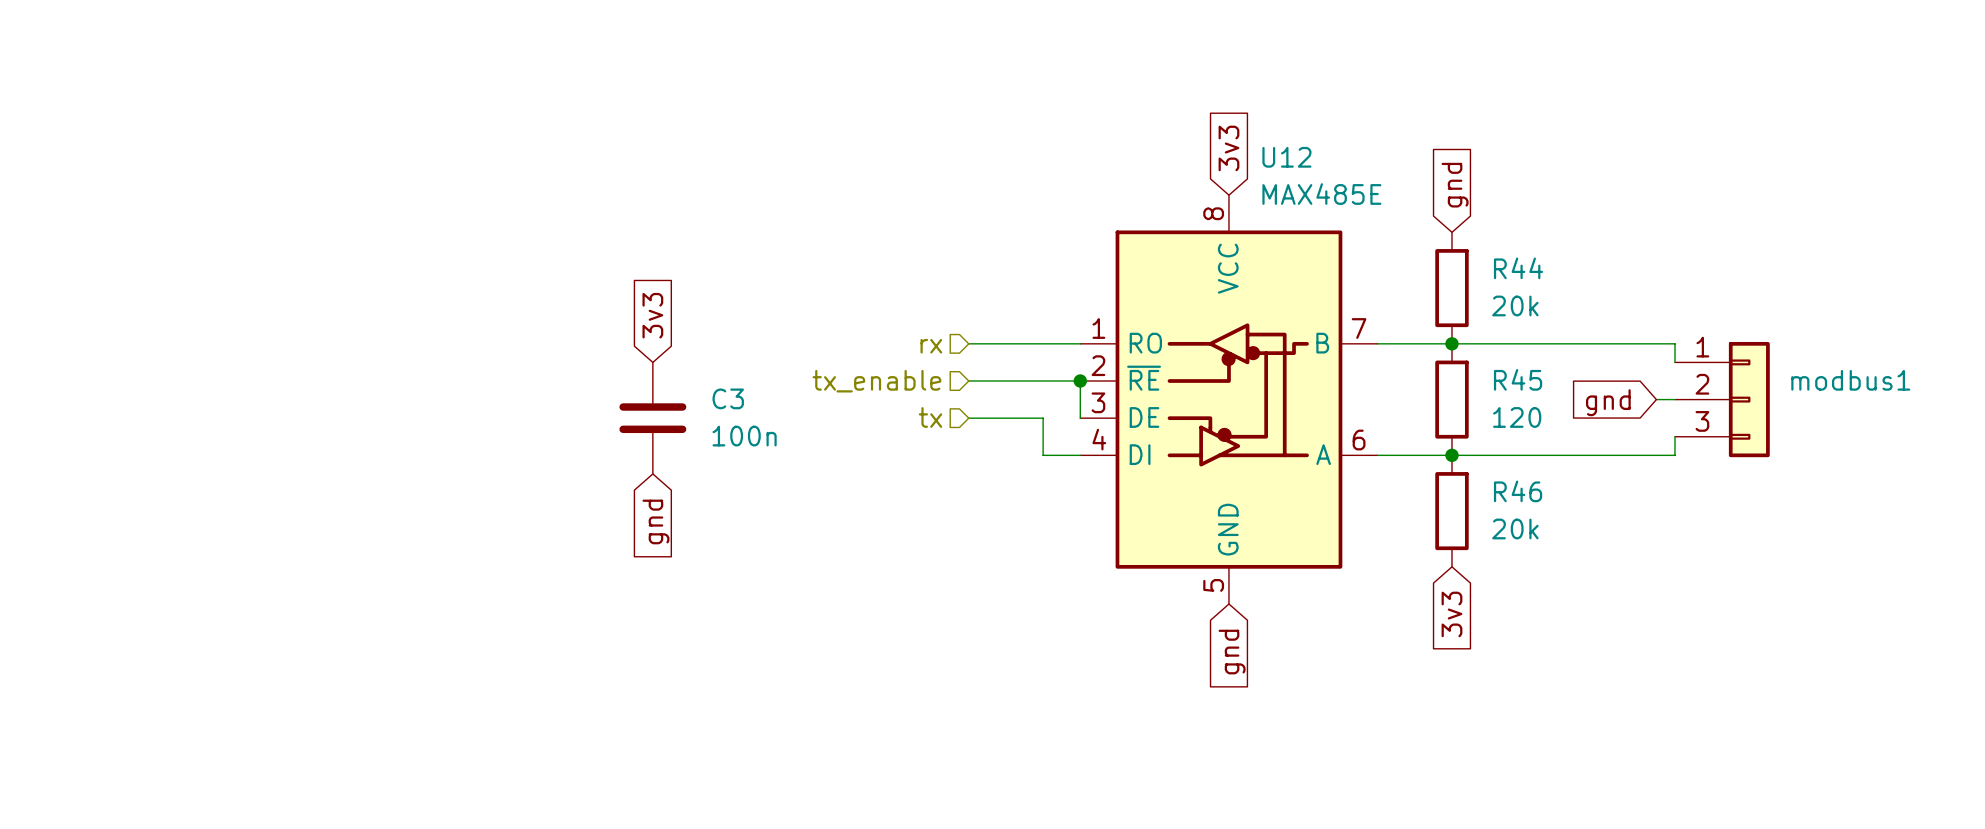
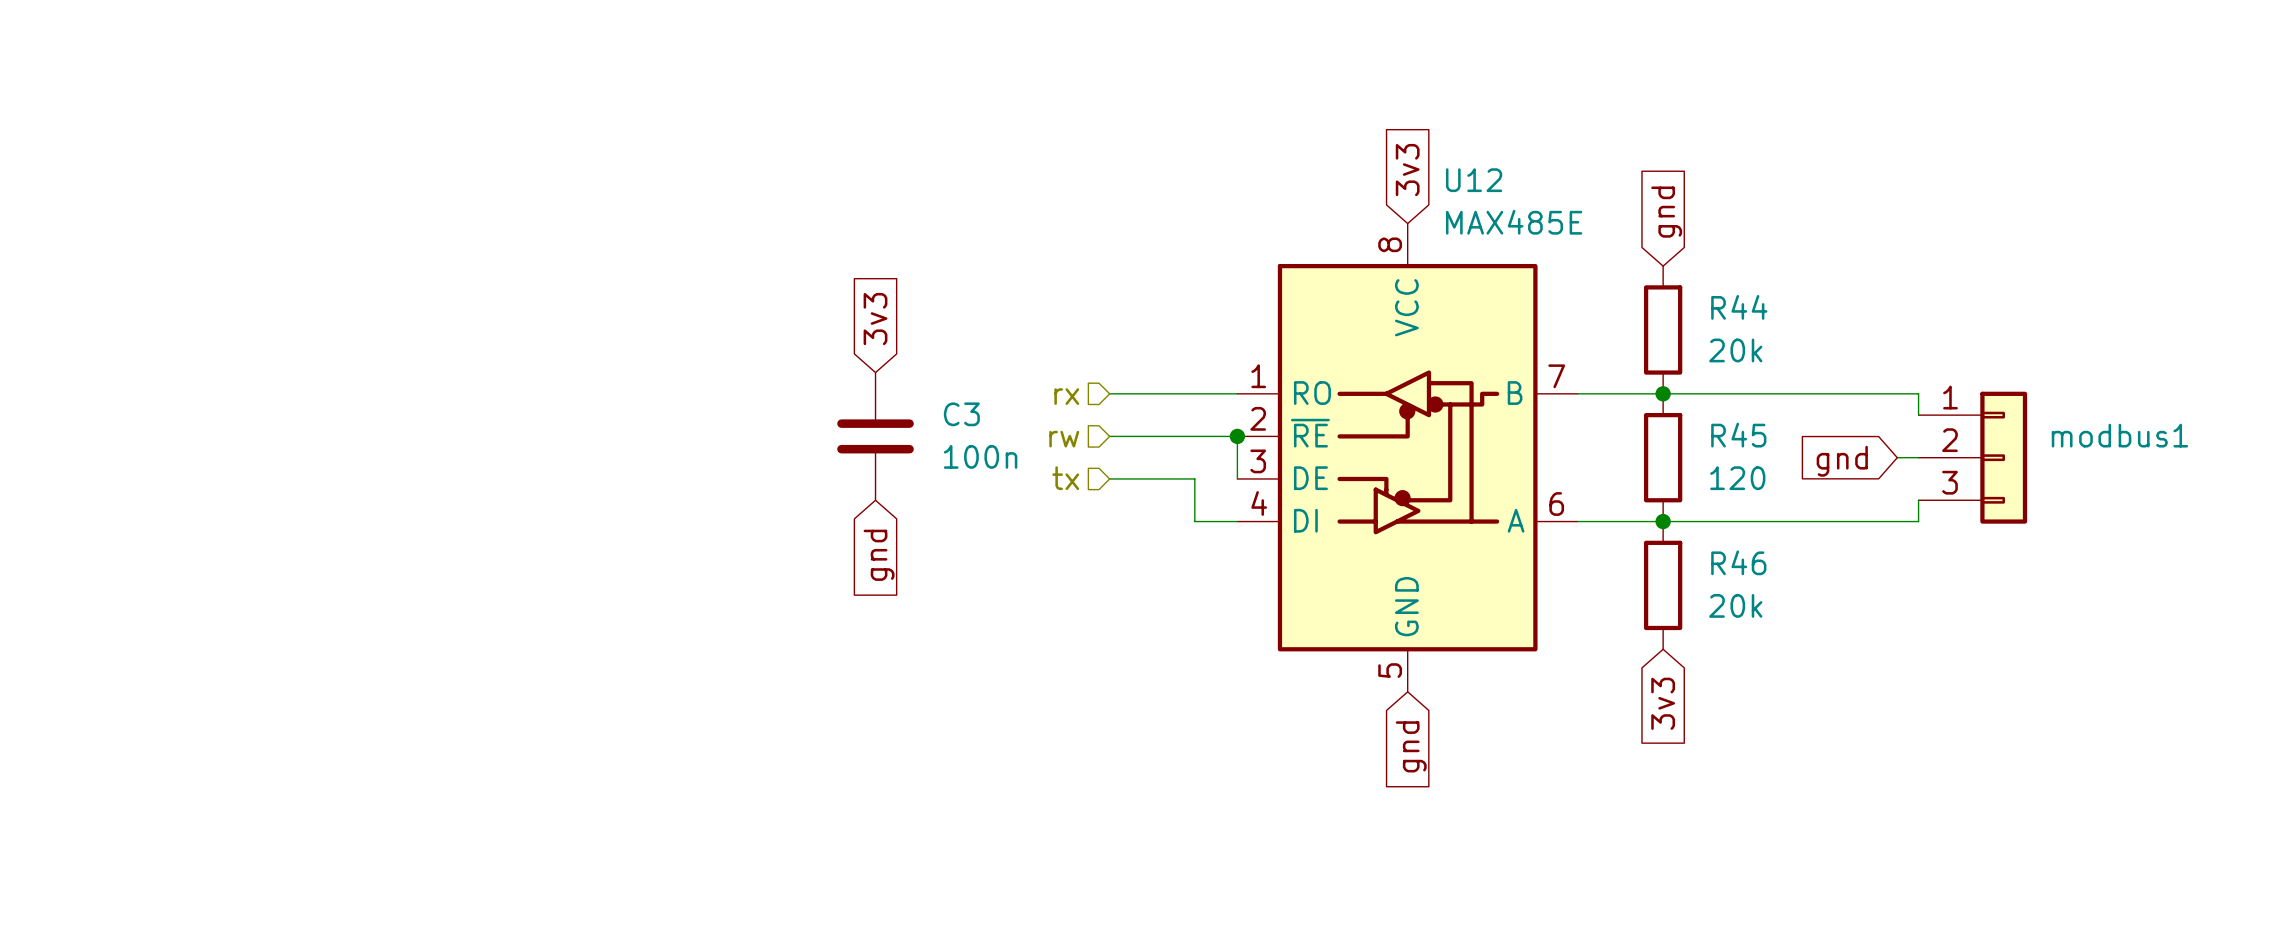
global label position: 3v3 (652, 315) -> 3v3 (875, 319)
hierarchical label: tx_enable (876, 381) -> rw (1064, 439)
C3 position: (652, 418) -> (875, 436)
global label position: gnd (655, 521) -> gnd (879, 555)

